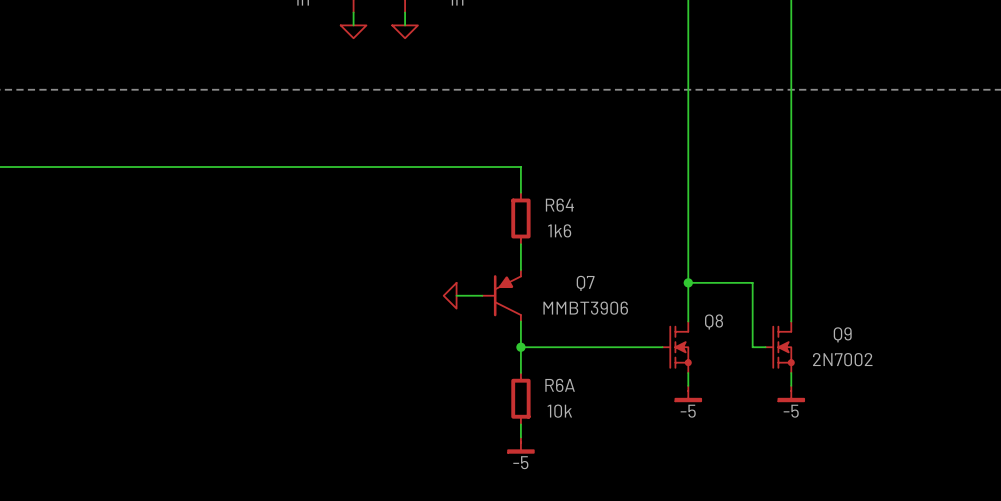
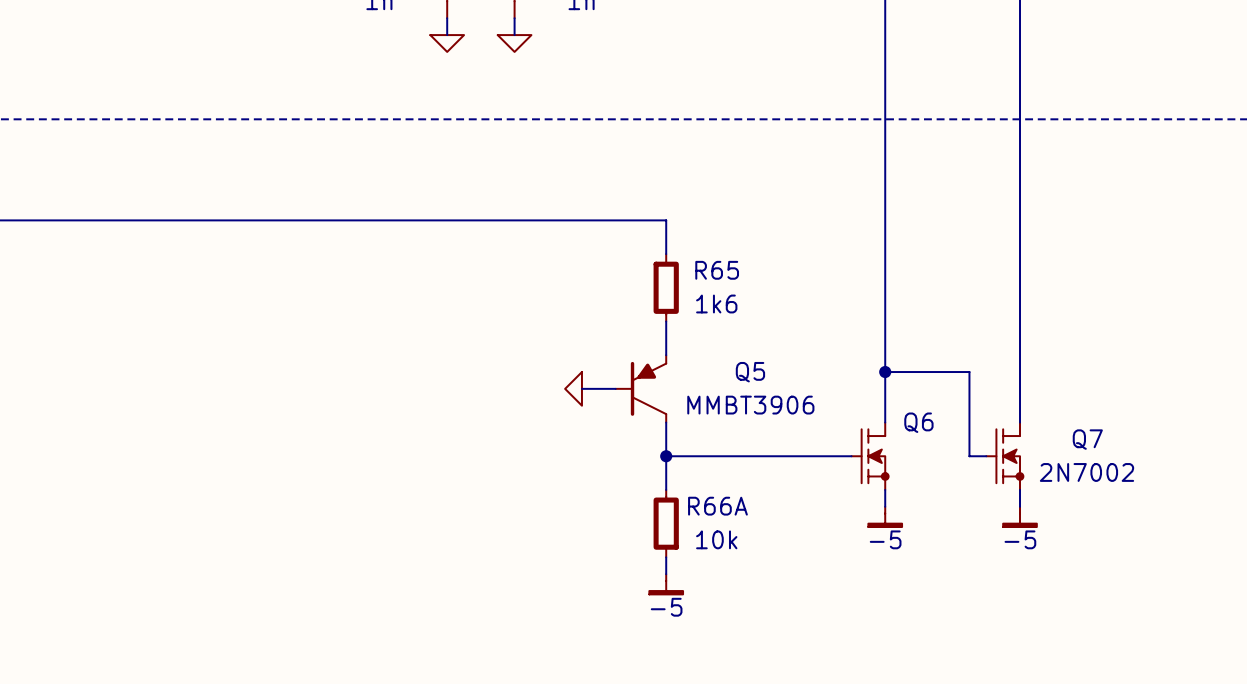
R64 name: R64 (559, 205) -> R65 (717, 270)
Q7 name: Q7 (585, 283) -> Q5 (750, 372)
Q8 name: Q8 (714, 321) -> Q6 (918, 422)
Q9 name: Q9 (842, 334) -> Q7 (1087, 439)
R6A name: R6A (560, 385) -> R66A (717, 506)

